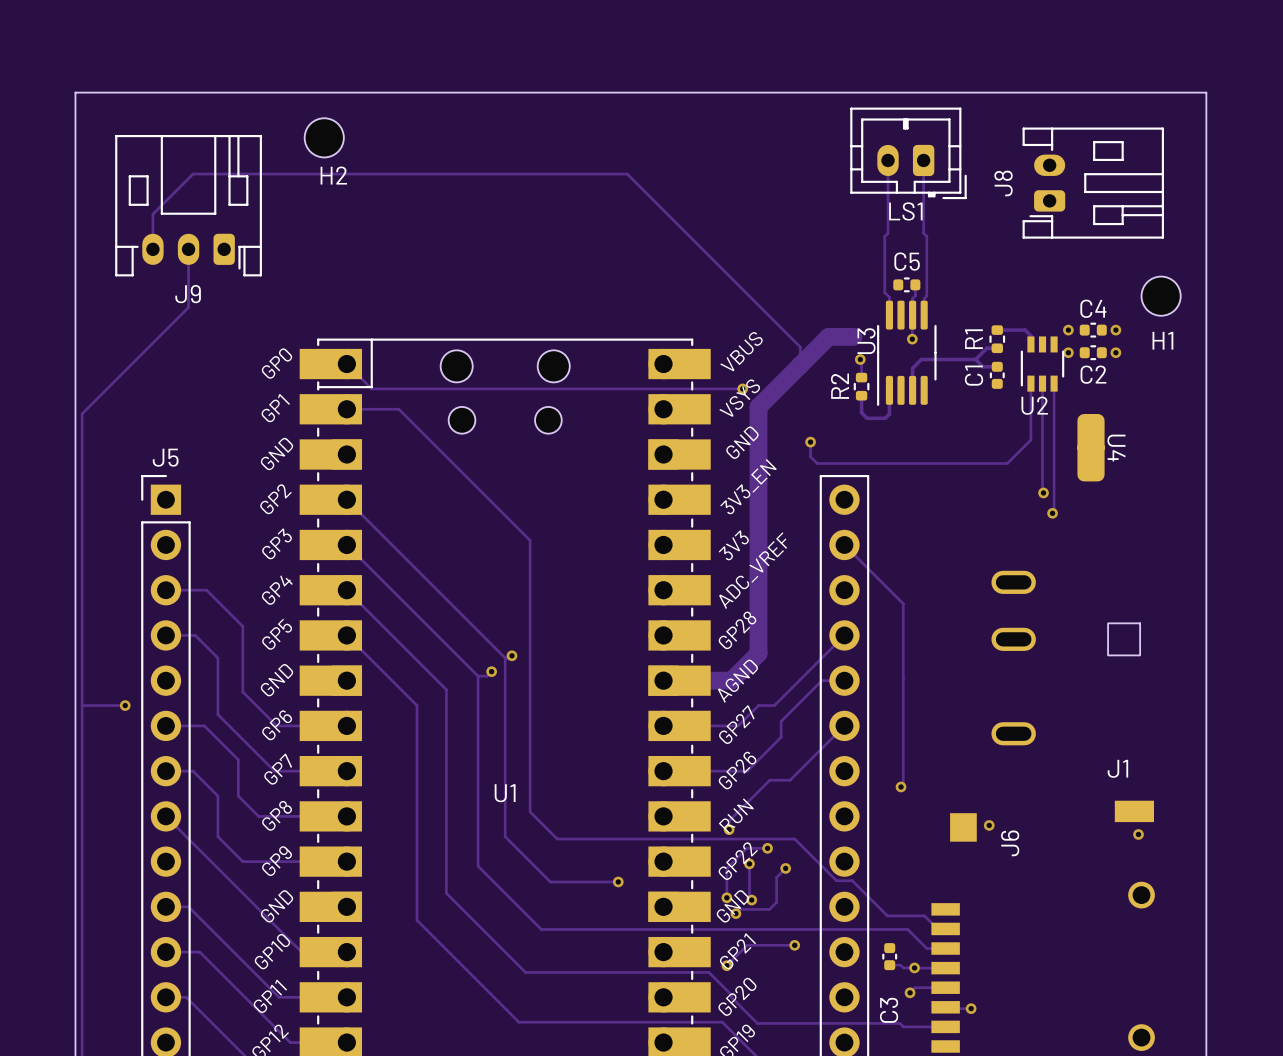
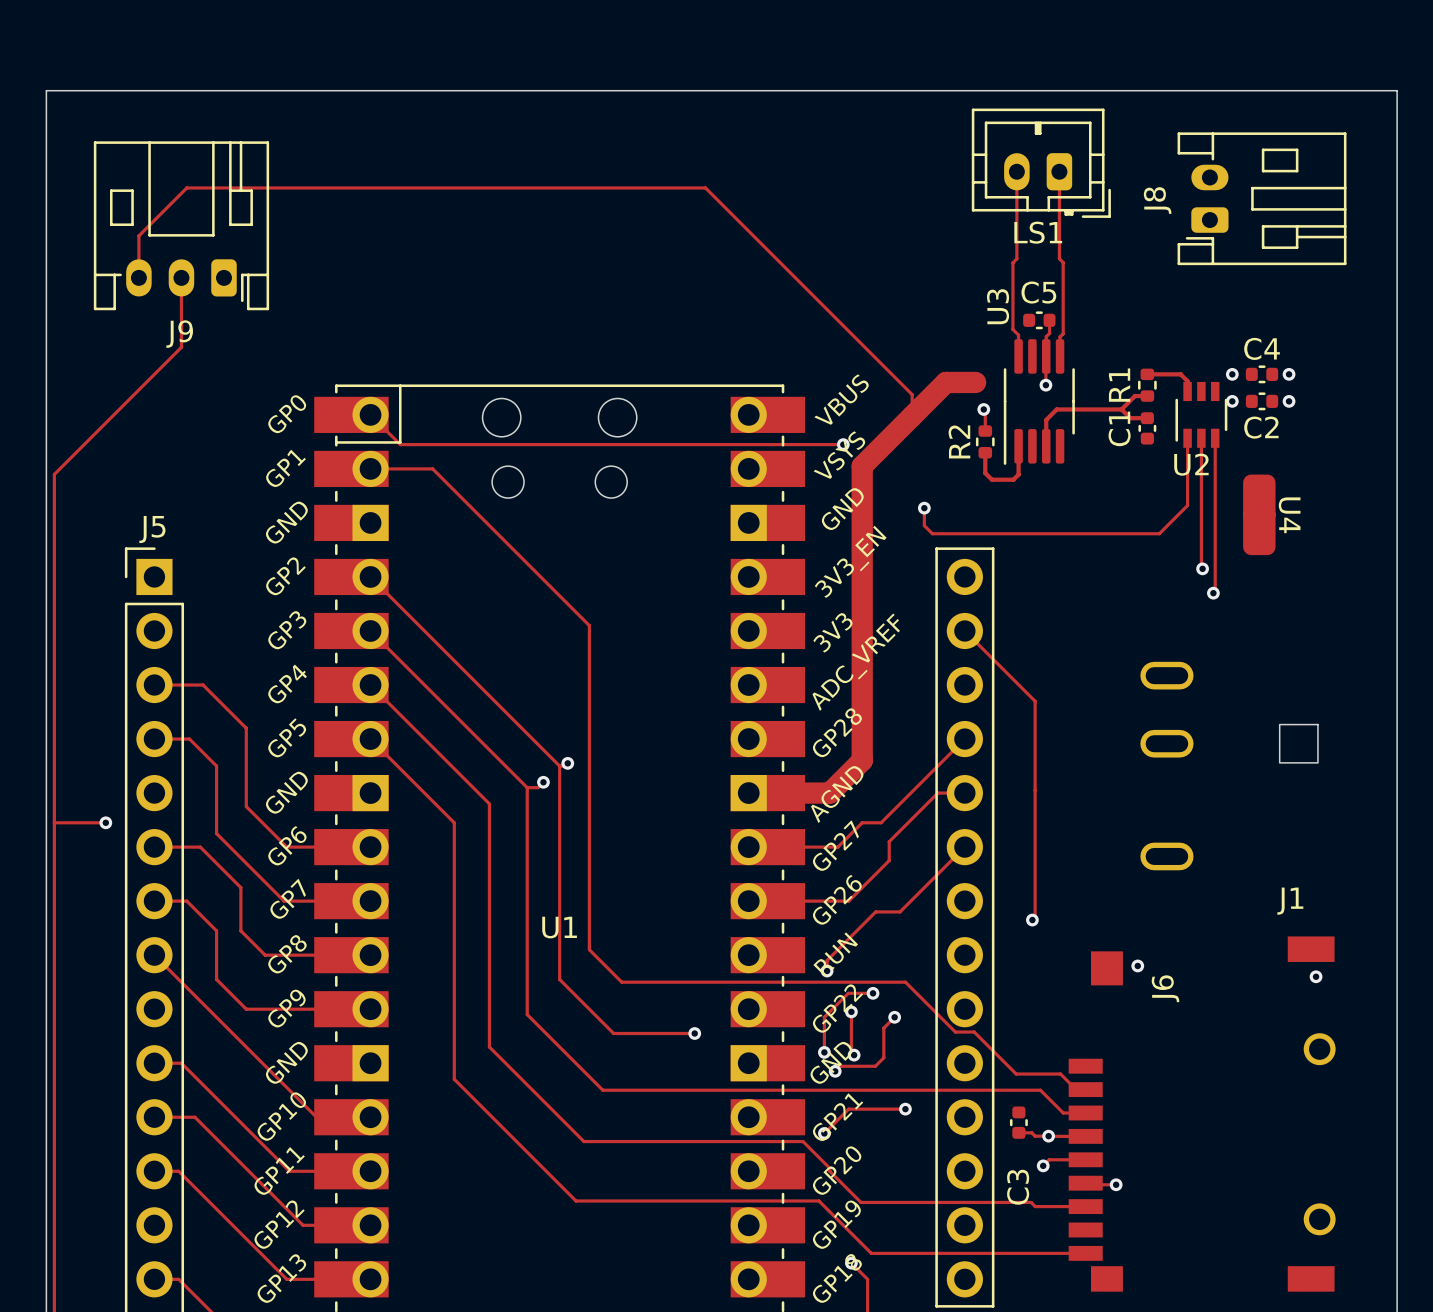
H2: (324, 137) -> none
H1: (1161, 296) -> none
U3 name position: U3 (866, 341) -> U3 (998, 306)

